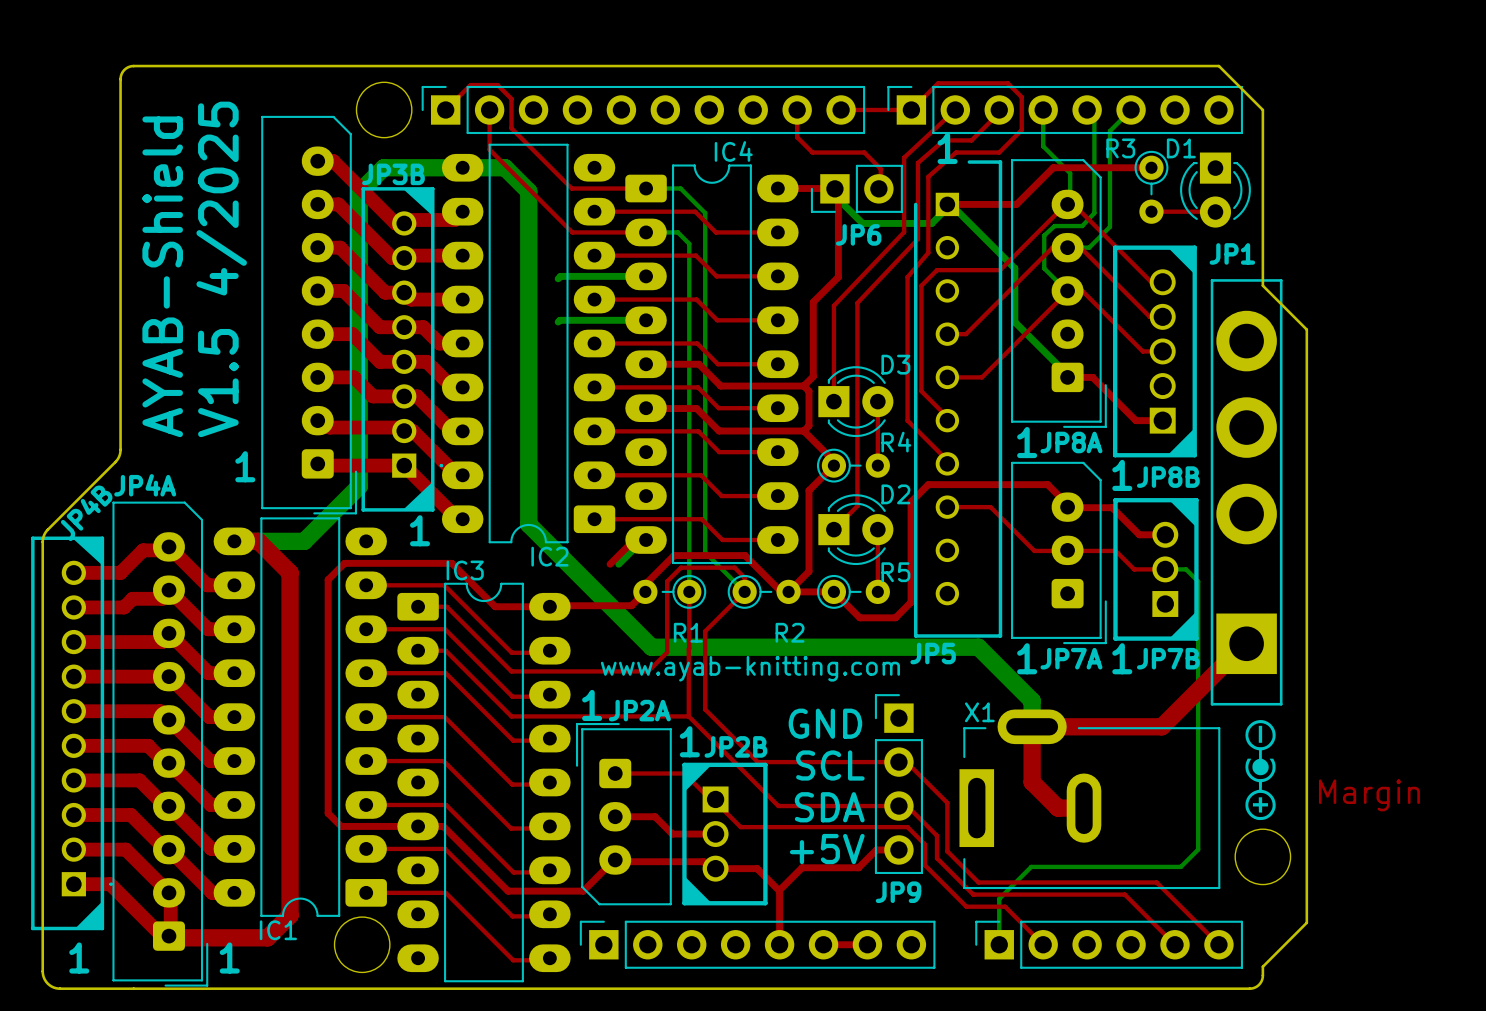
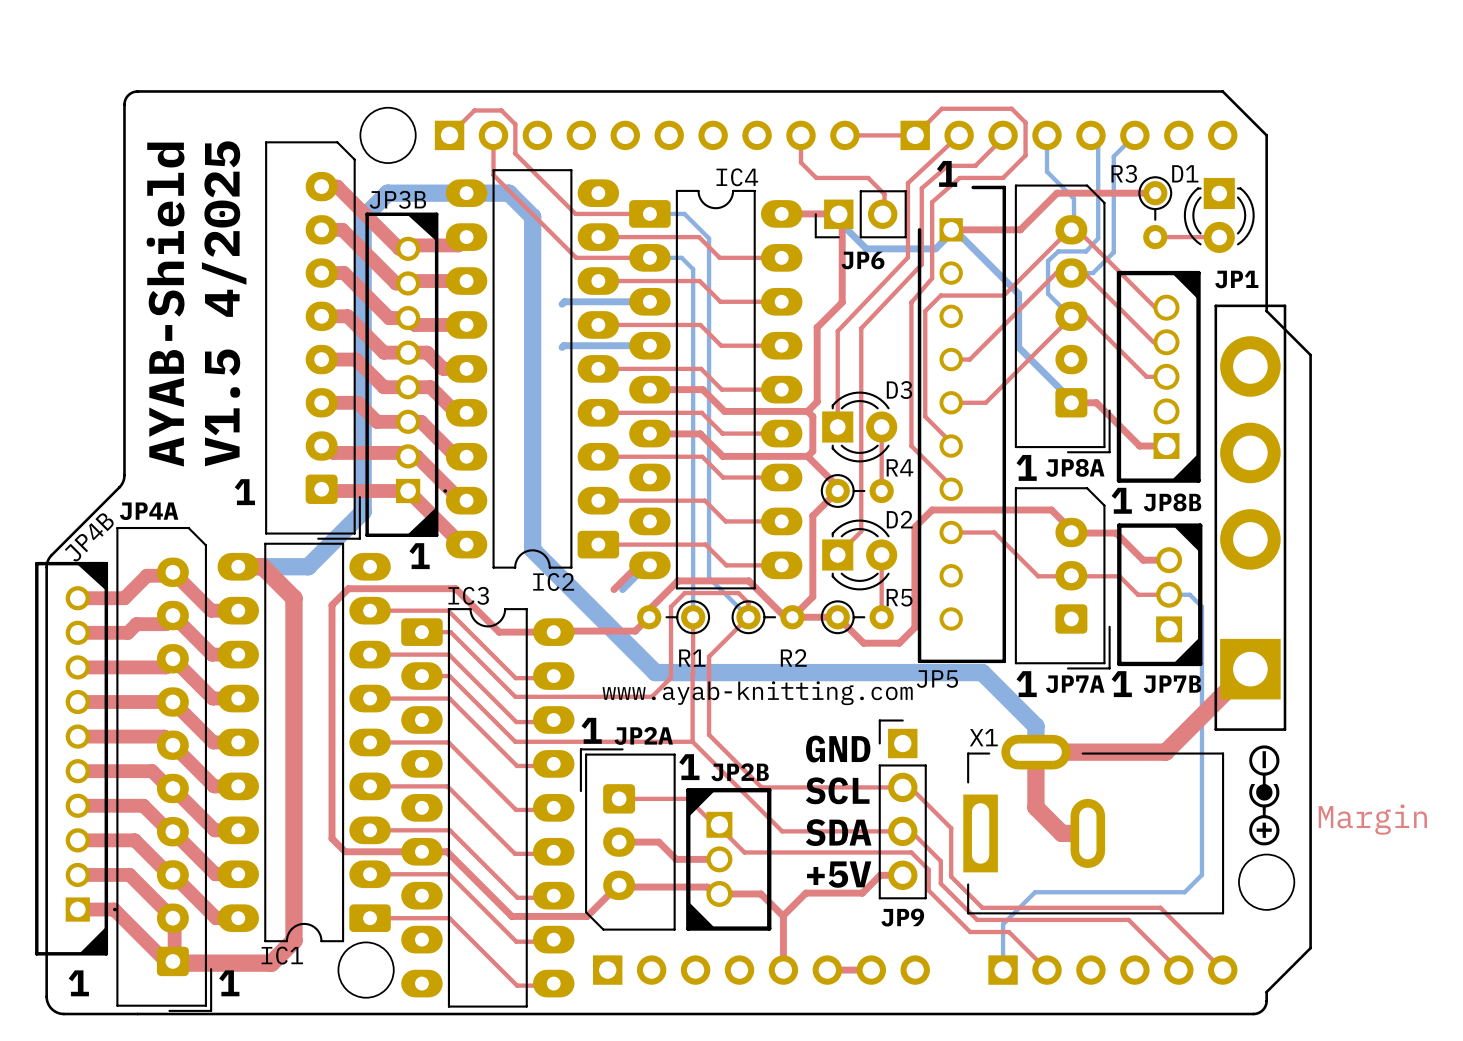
part side: top (643, 109) -> bottom (647, 135)
part side: top (1065, 109) -> bottom (1068, 135)
part side: top (757, 944) -> bottom (761, 970)
part side: top (1109, 944) -> bottom (1112, 970)

